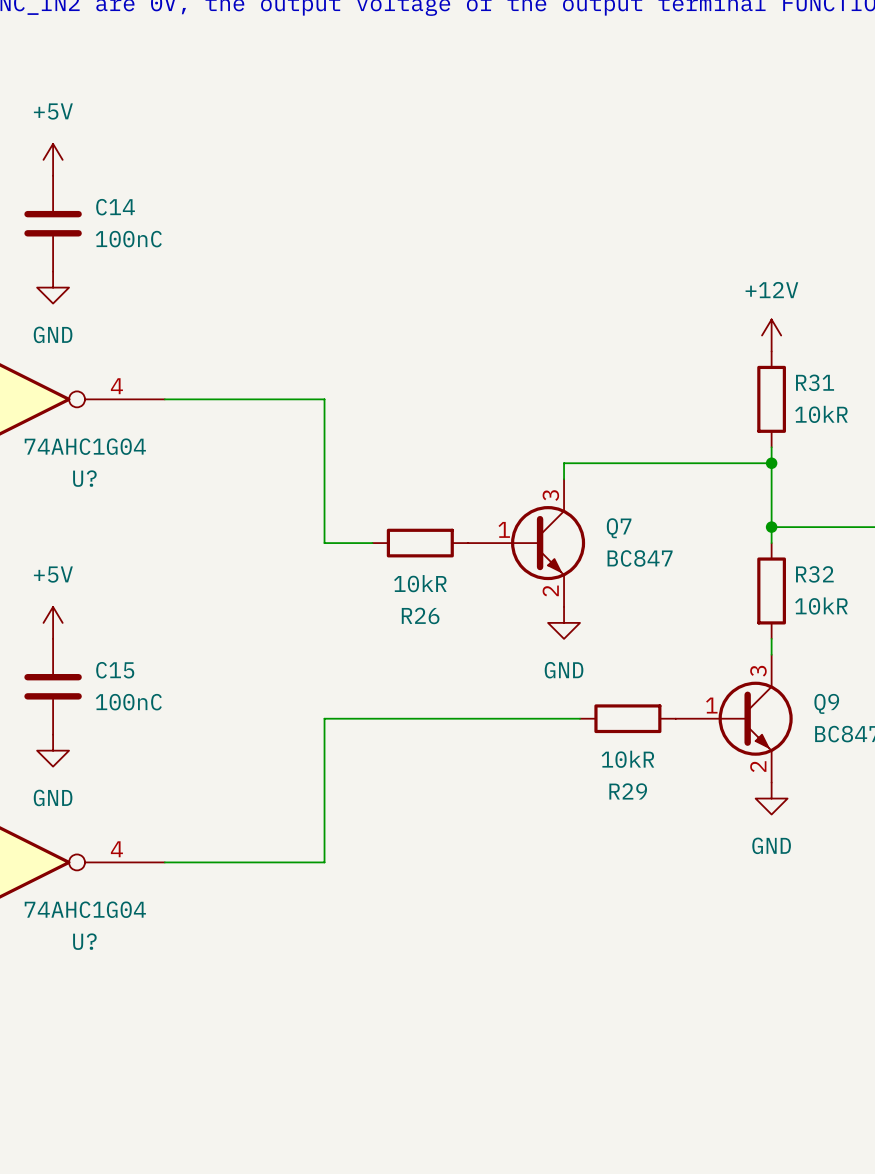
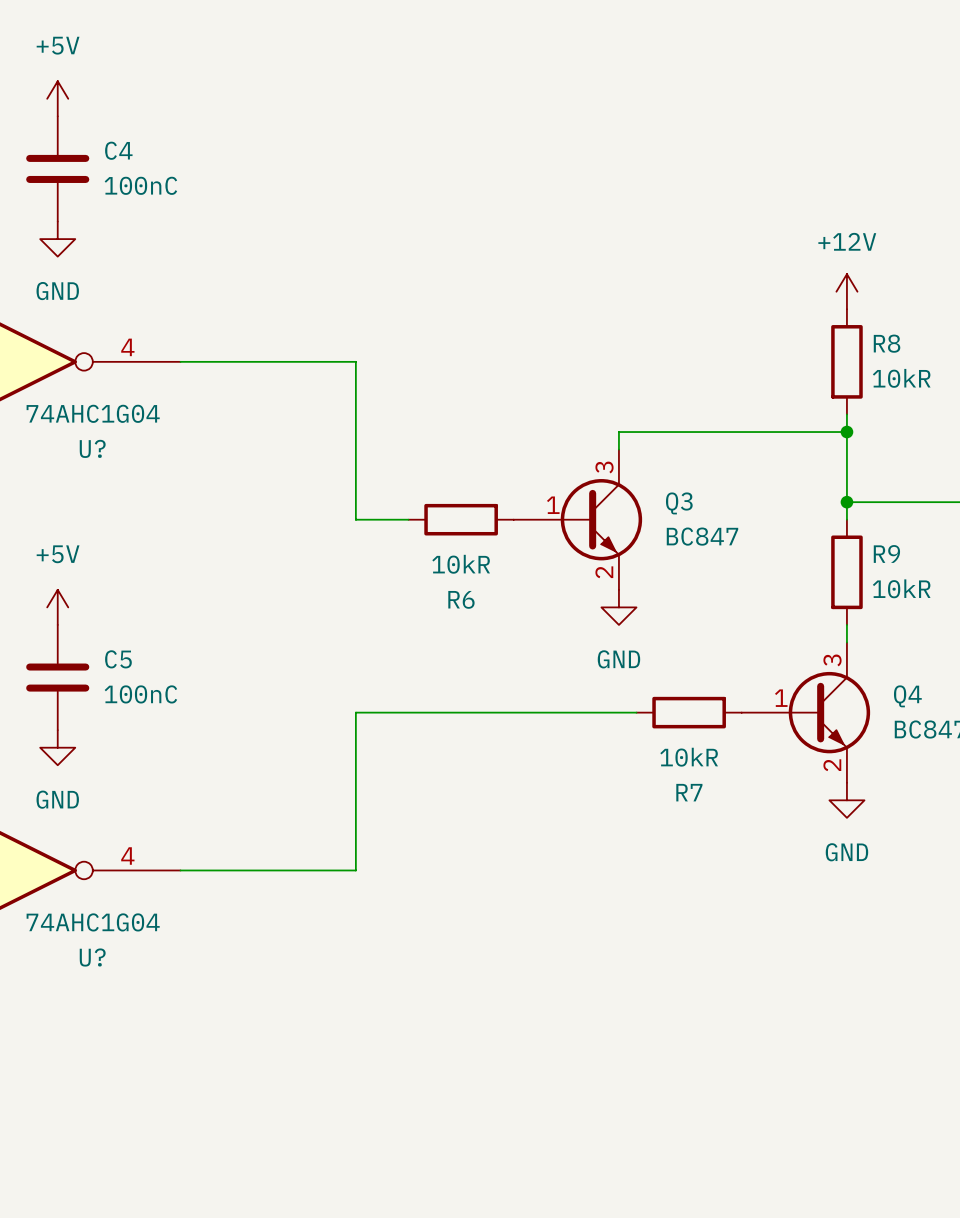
C14 name: C14 (115, 207) -> C4 (118, 150)
R31 name: R31 (815, 382) -> R8 (887, 343)
Q7 name: Q7 (619, 528) -> Q3 (679, 503)
R32 name: R32 (814, 574) -> R9 (886, 553)
R26 name: R26 (420, 615) -> R6 (461, 599)
C15 name: C15 (115, 670) -> C5 (118, 659)
Q9 name: Q9 (826, 703) -> Q4 (907, 696)
R29 name: R29 (628, 791) -> R7 (689, 792)

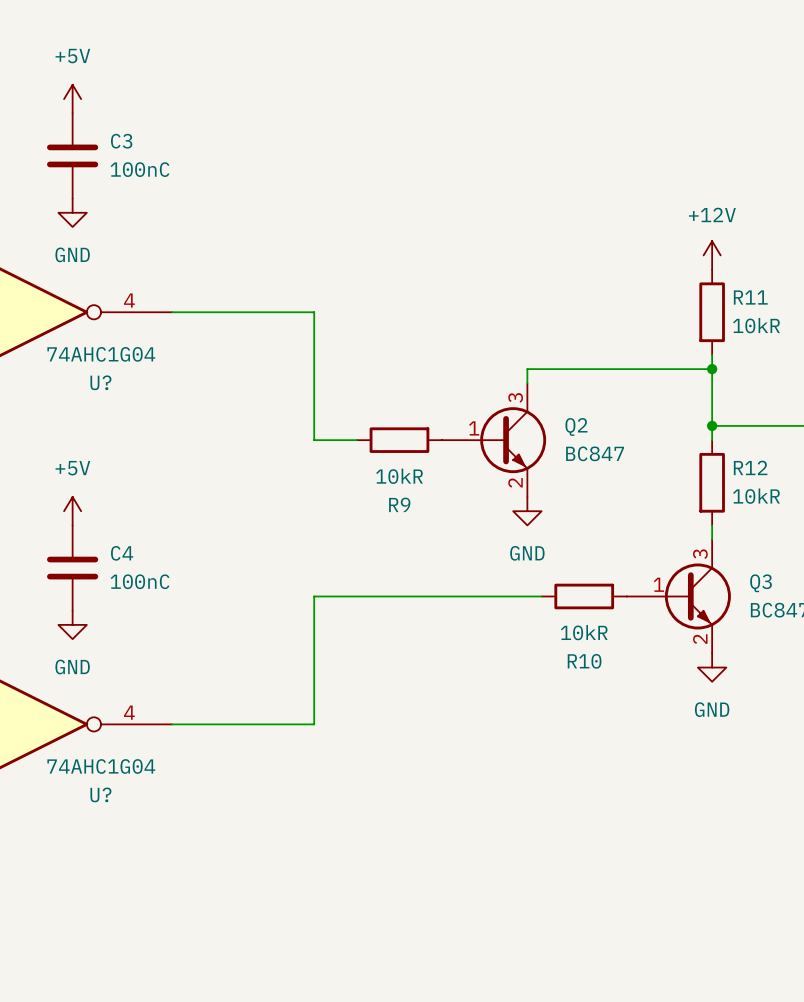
C4 name: C4 (118, 150) -> C3 (121, 141)
R8 name: R8 (887, 343) -> R11 (750, 297)
Q3 name: Q3 (679, 503) -> Q2 (576, 426)
R9 name: R9 (886, 553) -> R12 (750, 467)
R6 name: R6 (461, 599) -> R9 (399, 504)
C5 name: C5 (118, 659) -> C4 (122, 553)
Q4 name: Q4 (907, 696) -> Q3 (761, 583)
R7 name: R7 (689, 792) -> R10 (584, 661)

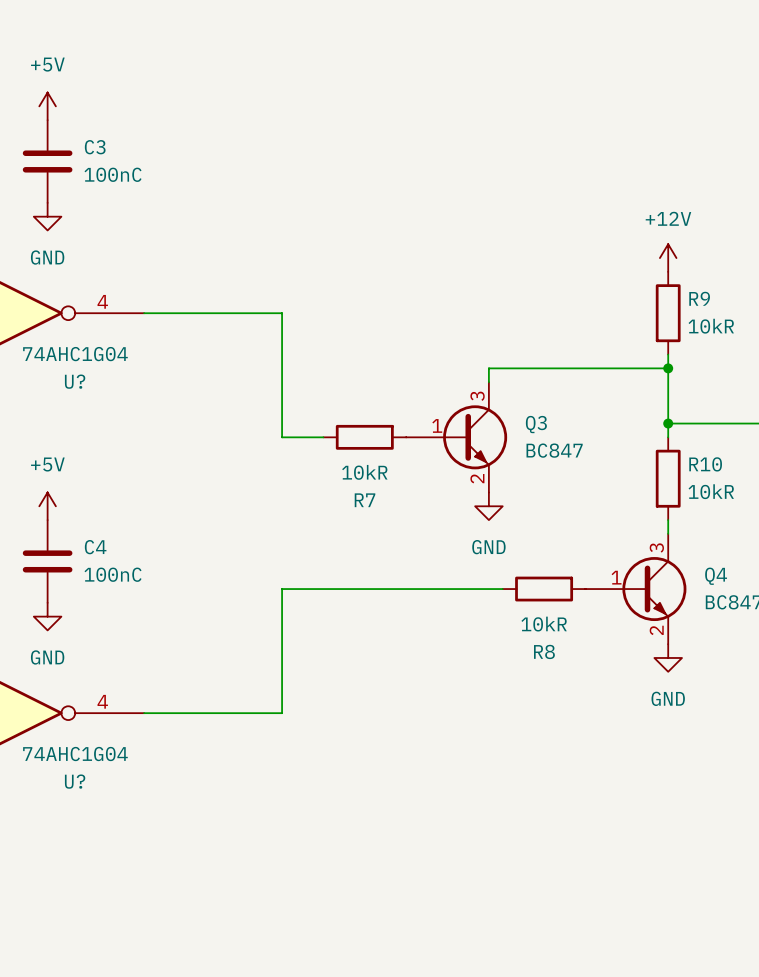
R11 name: R11 (750, 297) -> R9 (699, 298)
Q2 name: Q2 (576, 426) -> Q3 (536, 424)
R12 name: R12 (750, 467) -> R10 (705, 464)
R9 name: R9 (399, 504) -> R7 (365, 500)
Q3 name: Q3 (761, 583) -> Q4 (716, 576)
R10 name: R10 (584, 661) -> R8 (544, 651)

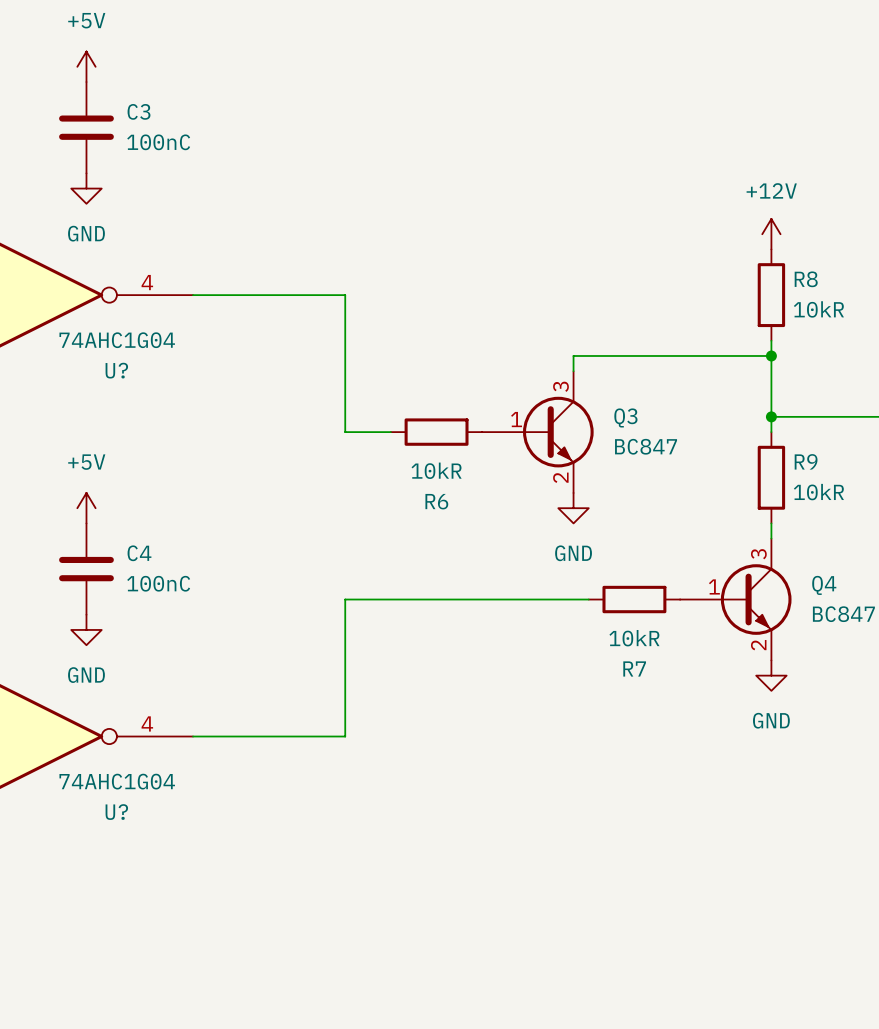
R9 name: R9 (699, 298) -> R8 (806, 279)
R10 name: R10 (705, 464) -> R9 (806, 461)
R7 name: R7 (365, 500) -> R6 (436, 501)
R8 name: R8 (544, 651) -> R7 (634, 668)

